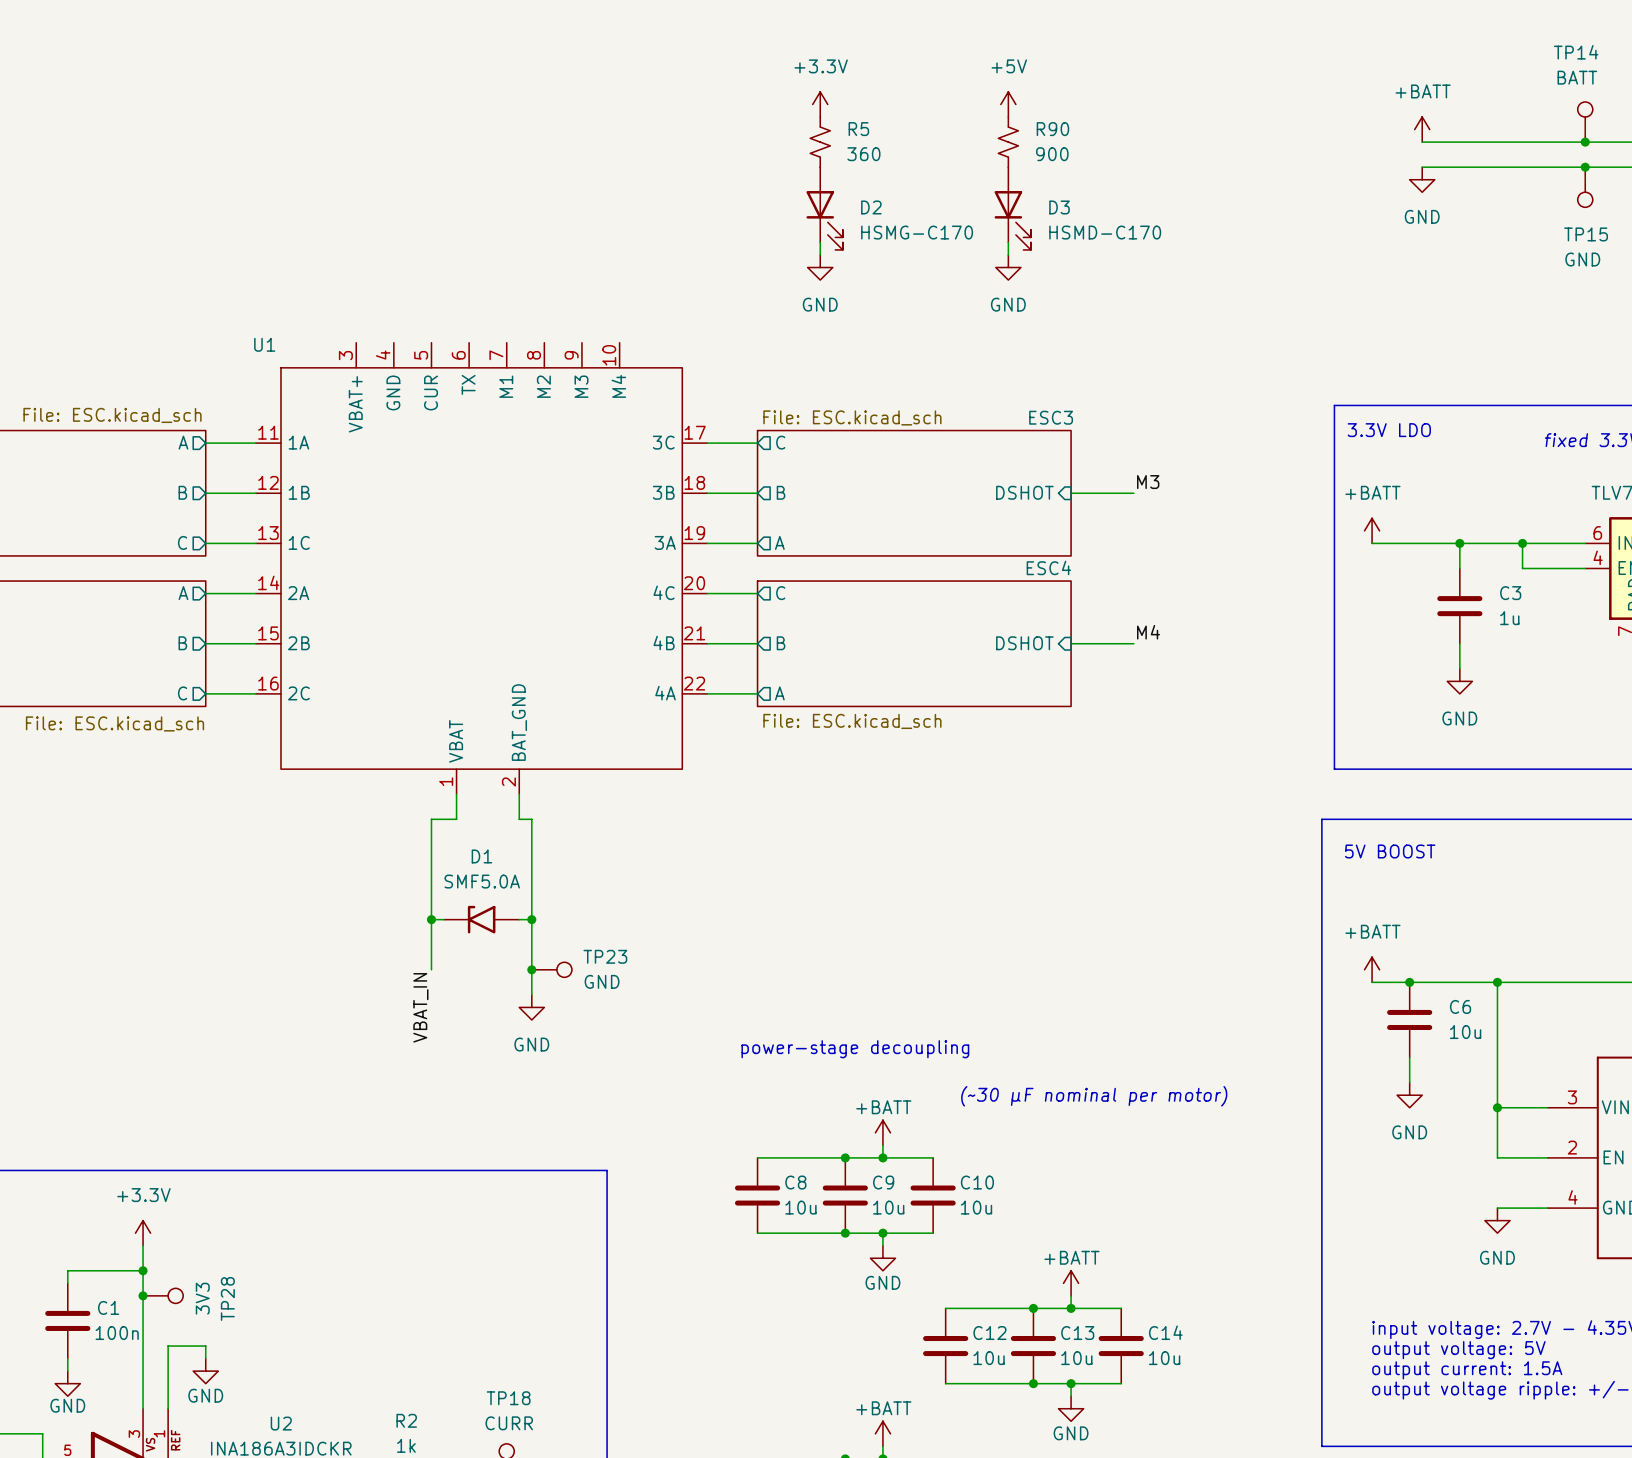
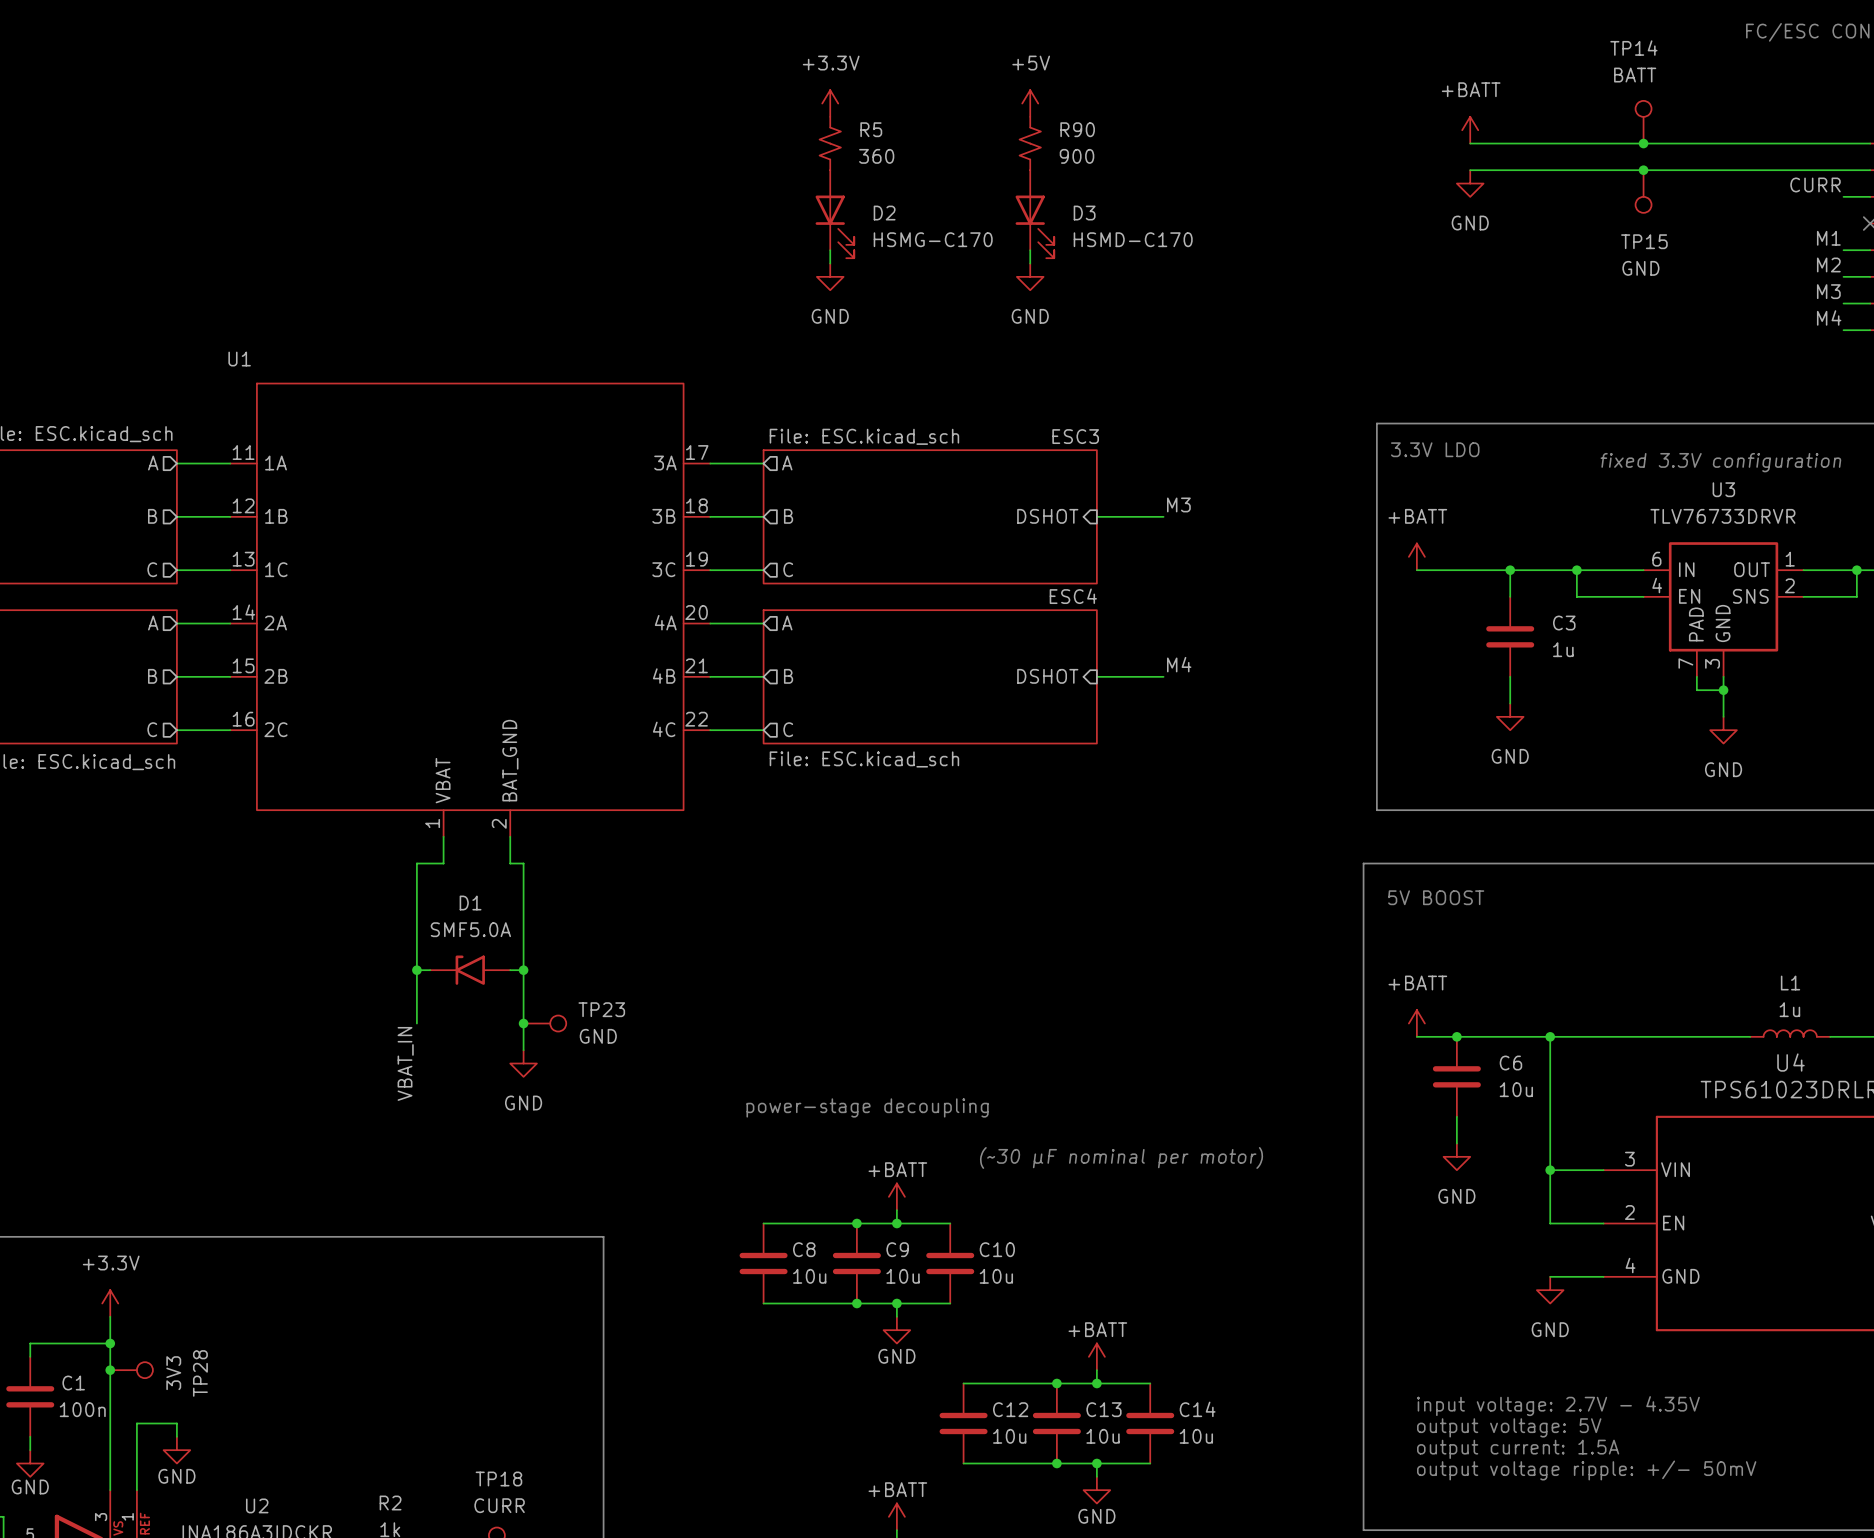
U1 symbol: [255, 342, 708, 795] -> [230, 383, 711, 837]
sheet pin: C (780, 442) -> A (787, 463)
sheet pin: A (779, 542) -> C (788, 569)
sheet pin: C (780, 593) -> A (787, 623)
sheet pin: A (779, 693) -> C (788, 729)

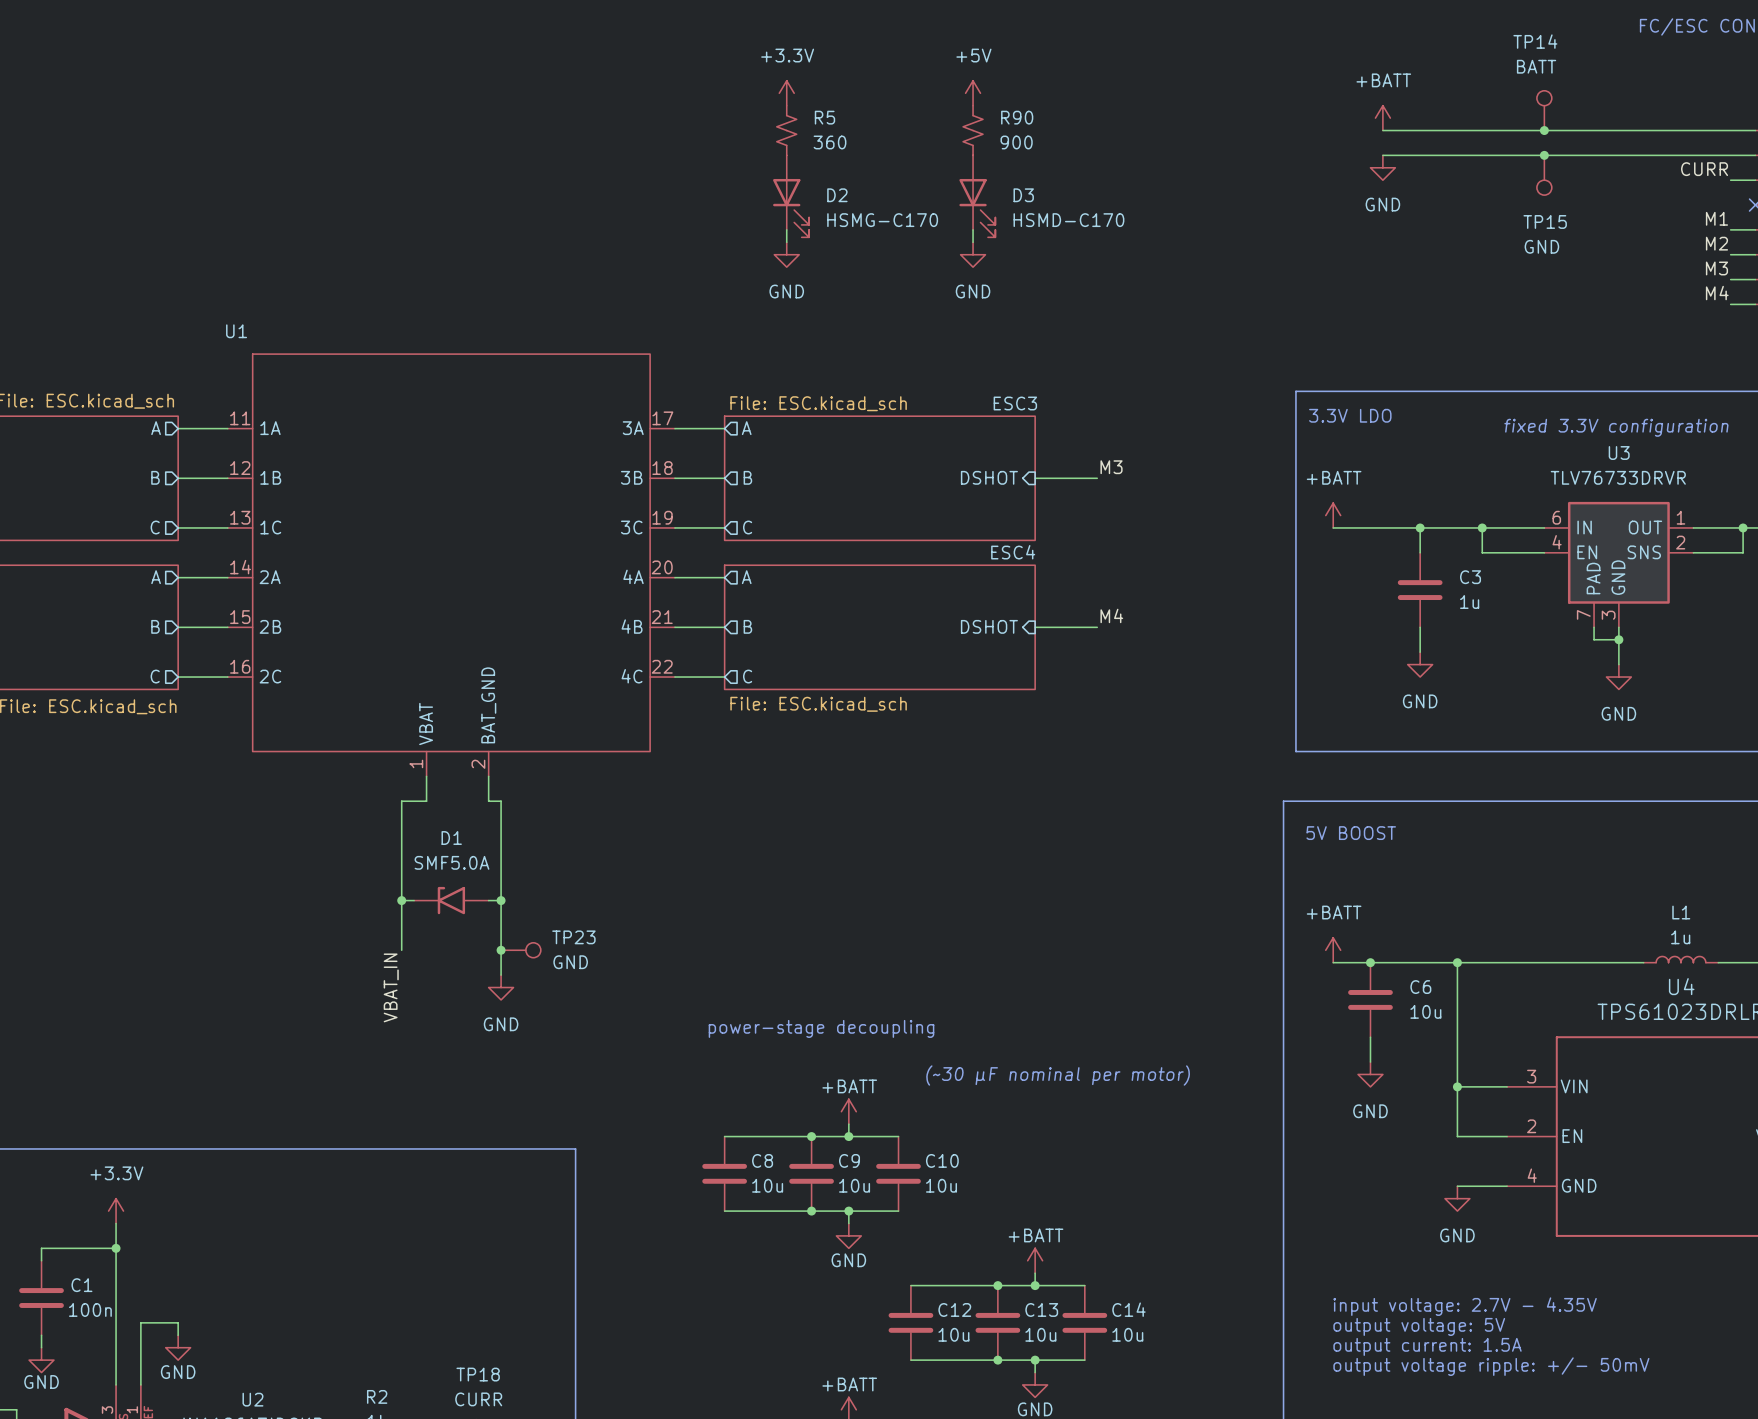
junction: (110, 1370) -> none
TP28: 3V3 (131, 1370) -> none

